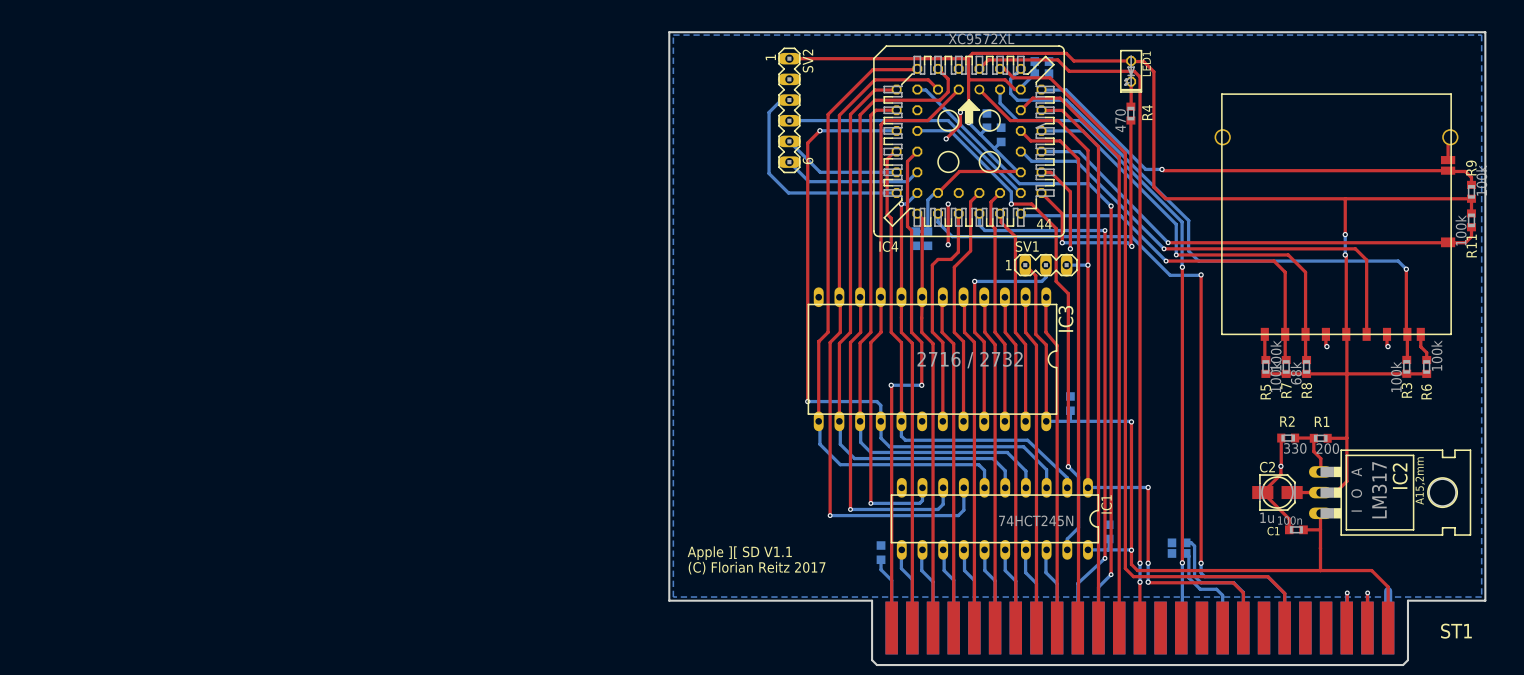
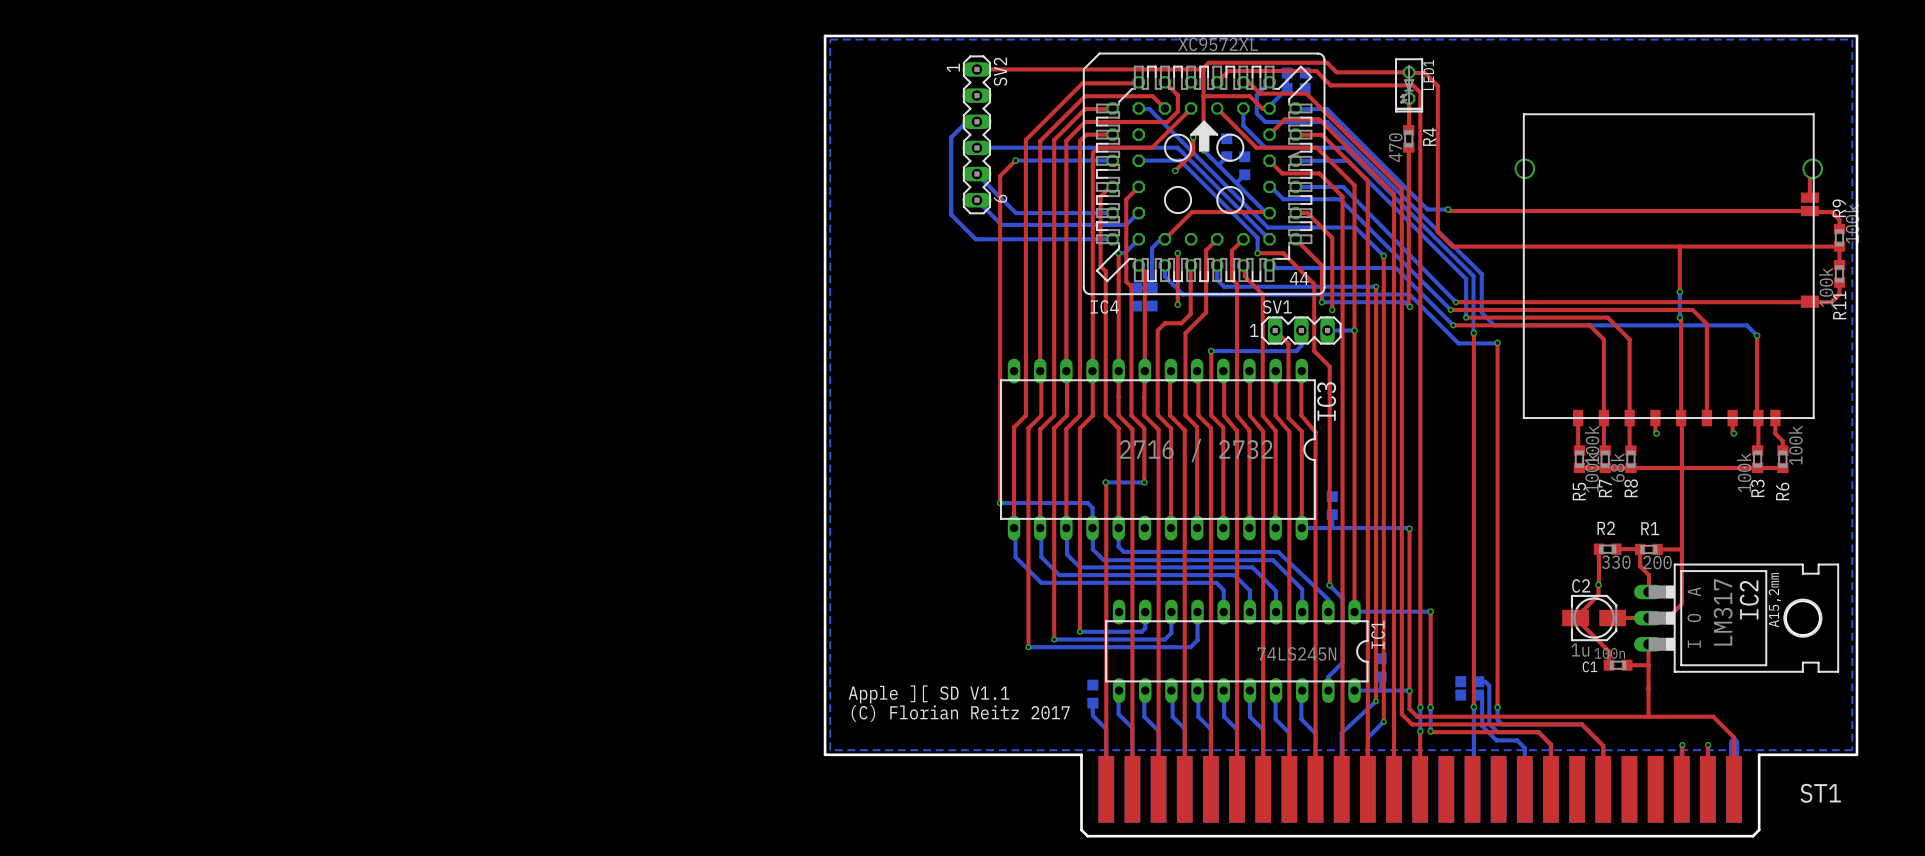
IC1 value: 74HCT245N (1036, 520) -> 74LS245N (1296, 653)

